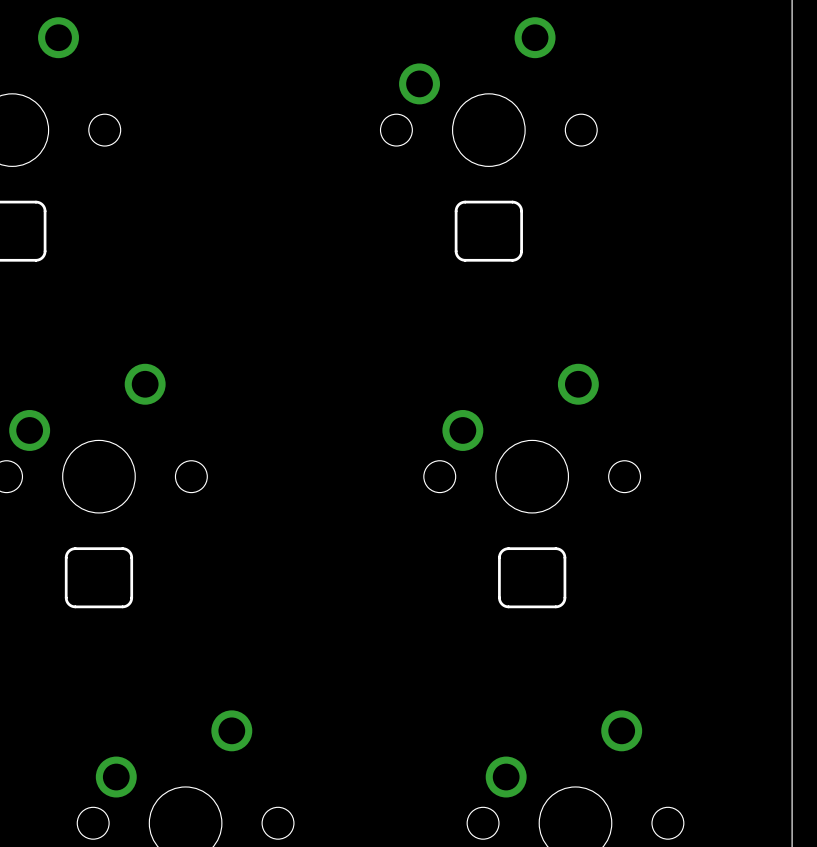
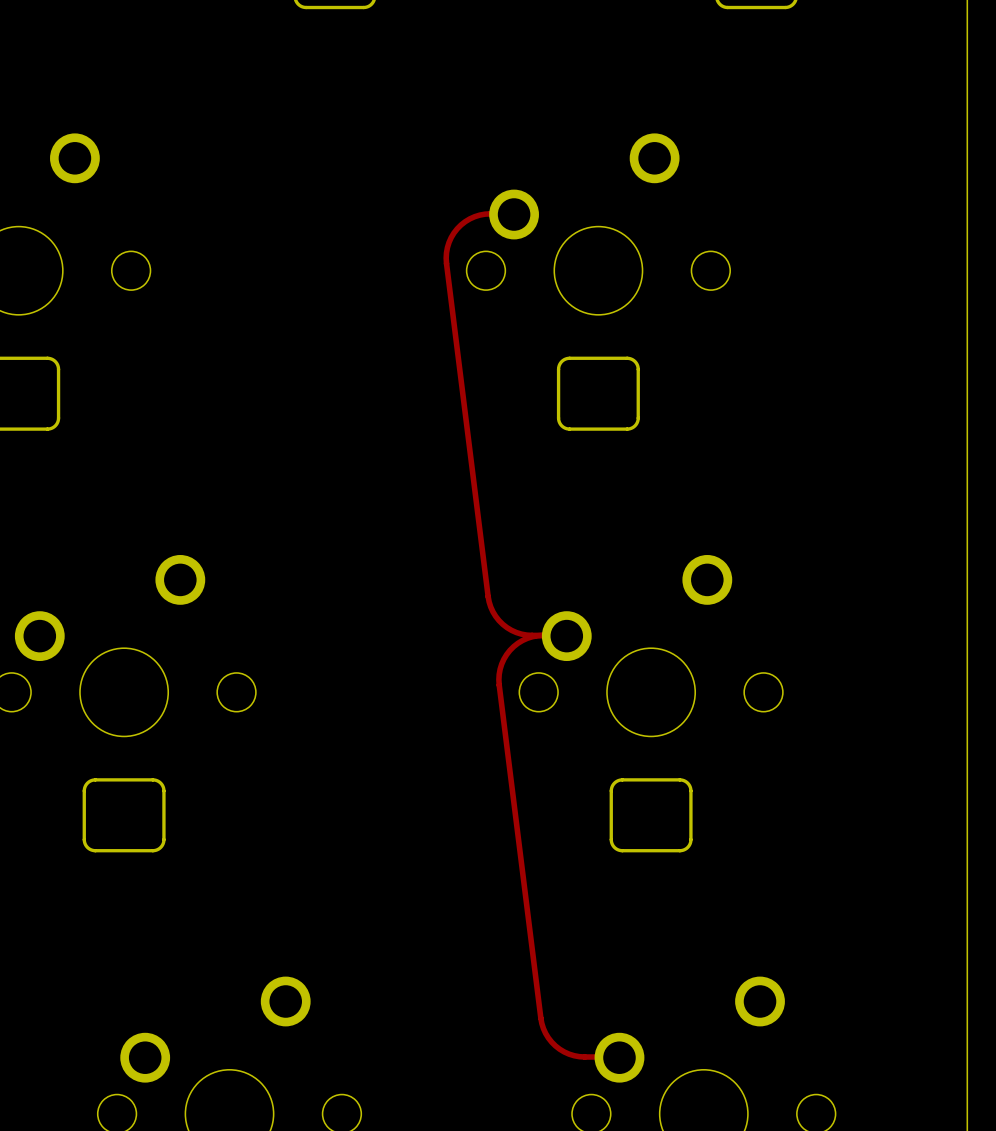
track: none -> (514, 214) (485, 214) (465, 221) (451, 237) (447, 247) (446, 263) (490, 606) (499, 620) (516, 632) (526, 635) (566, 636)
track: none -> (543, 635) (527, 638) (509, 650) (501, 664) (498, 679) (540, 1018) (548, 1037) (564, 1051) (579, 1056) (619, 1057)

